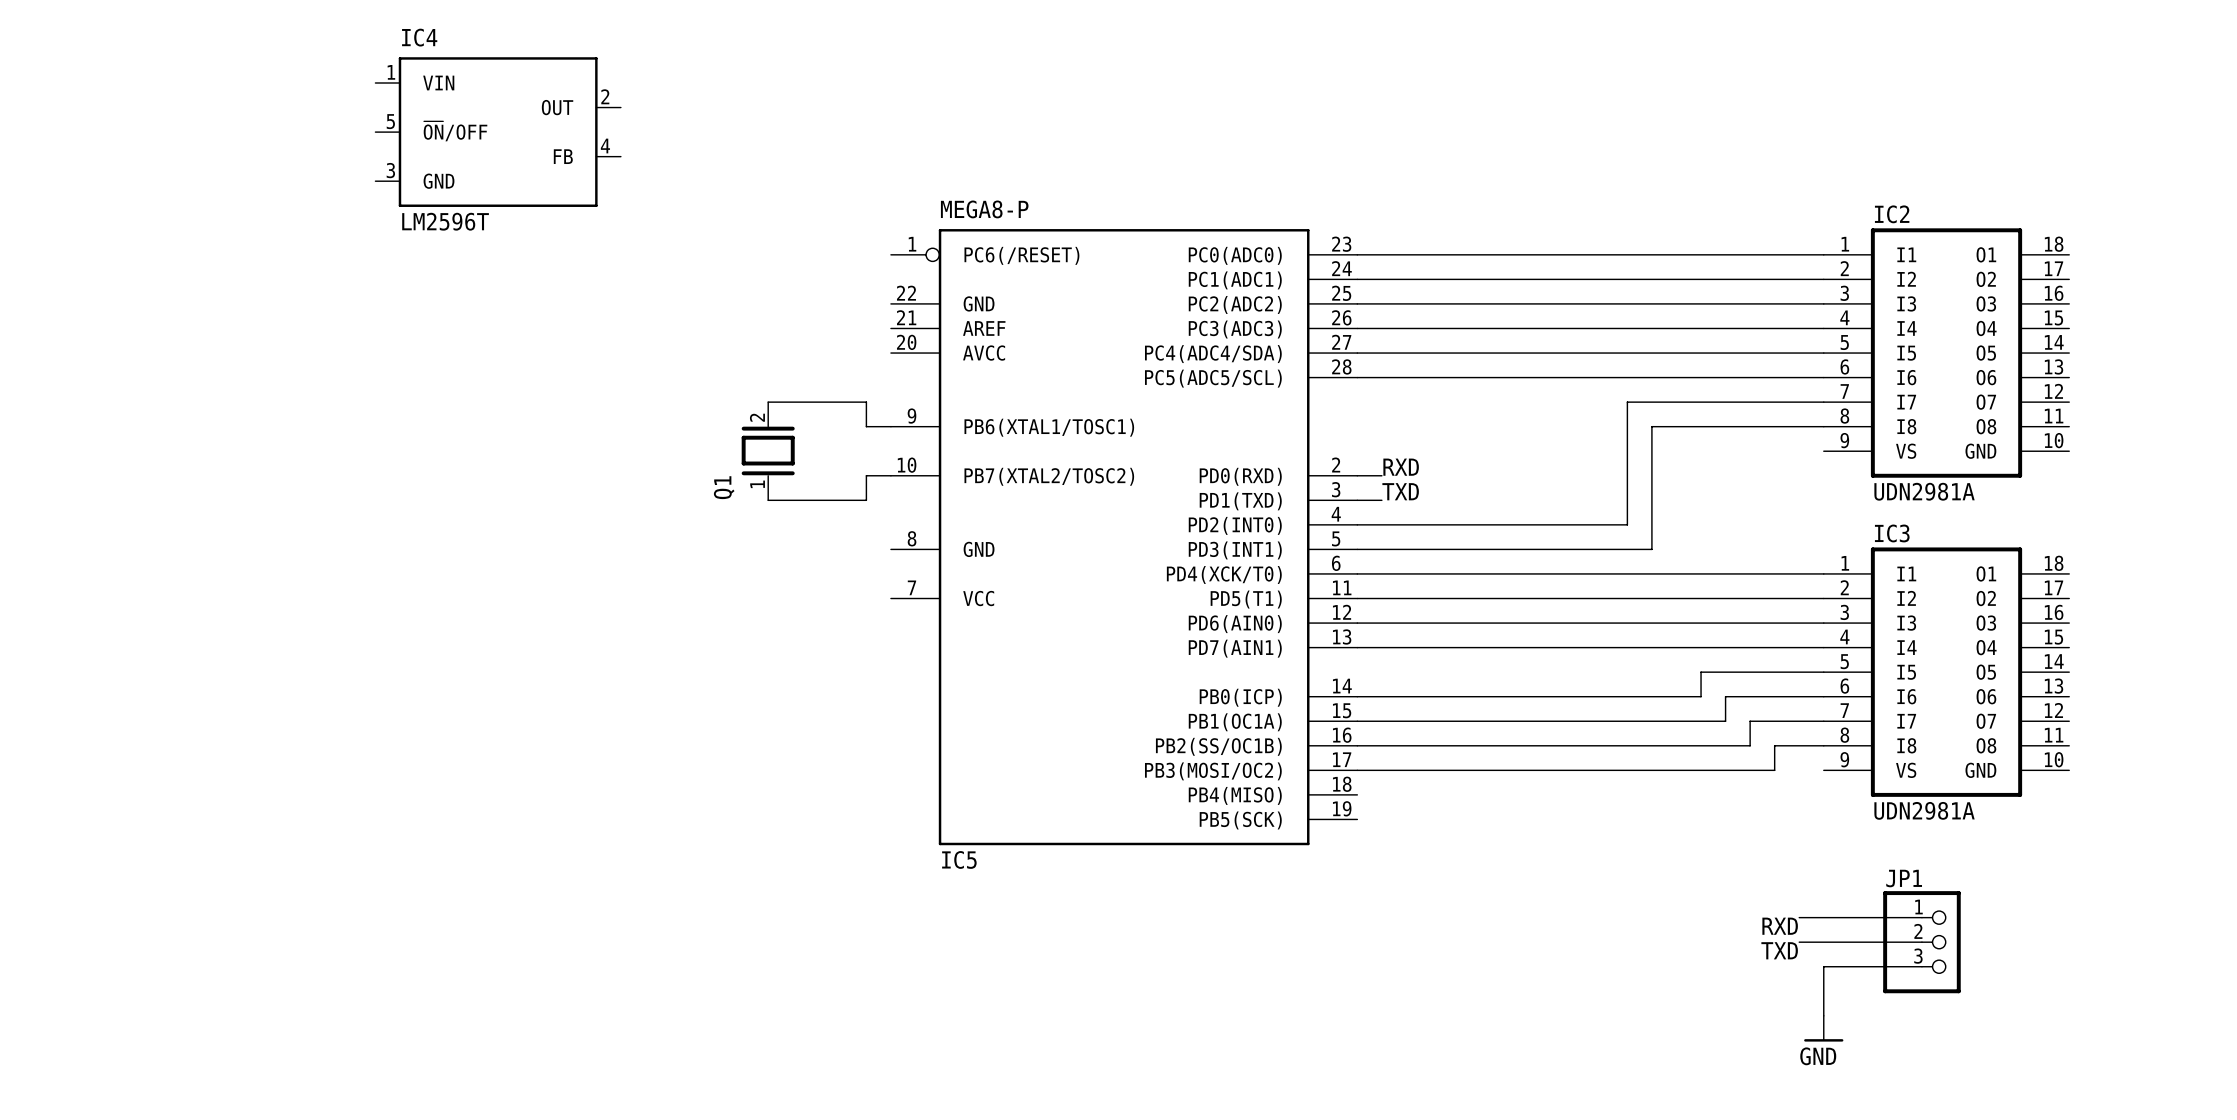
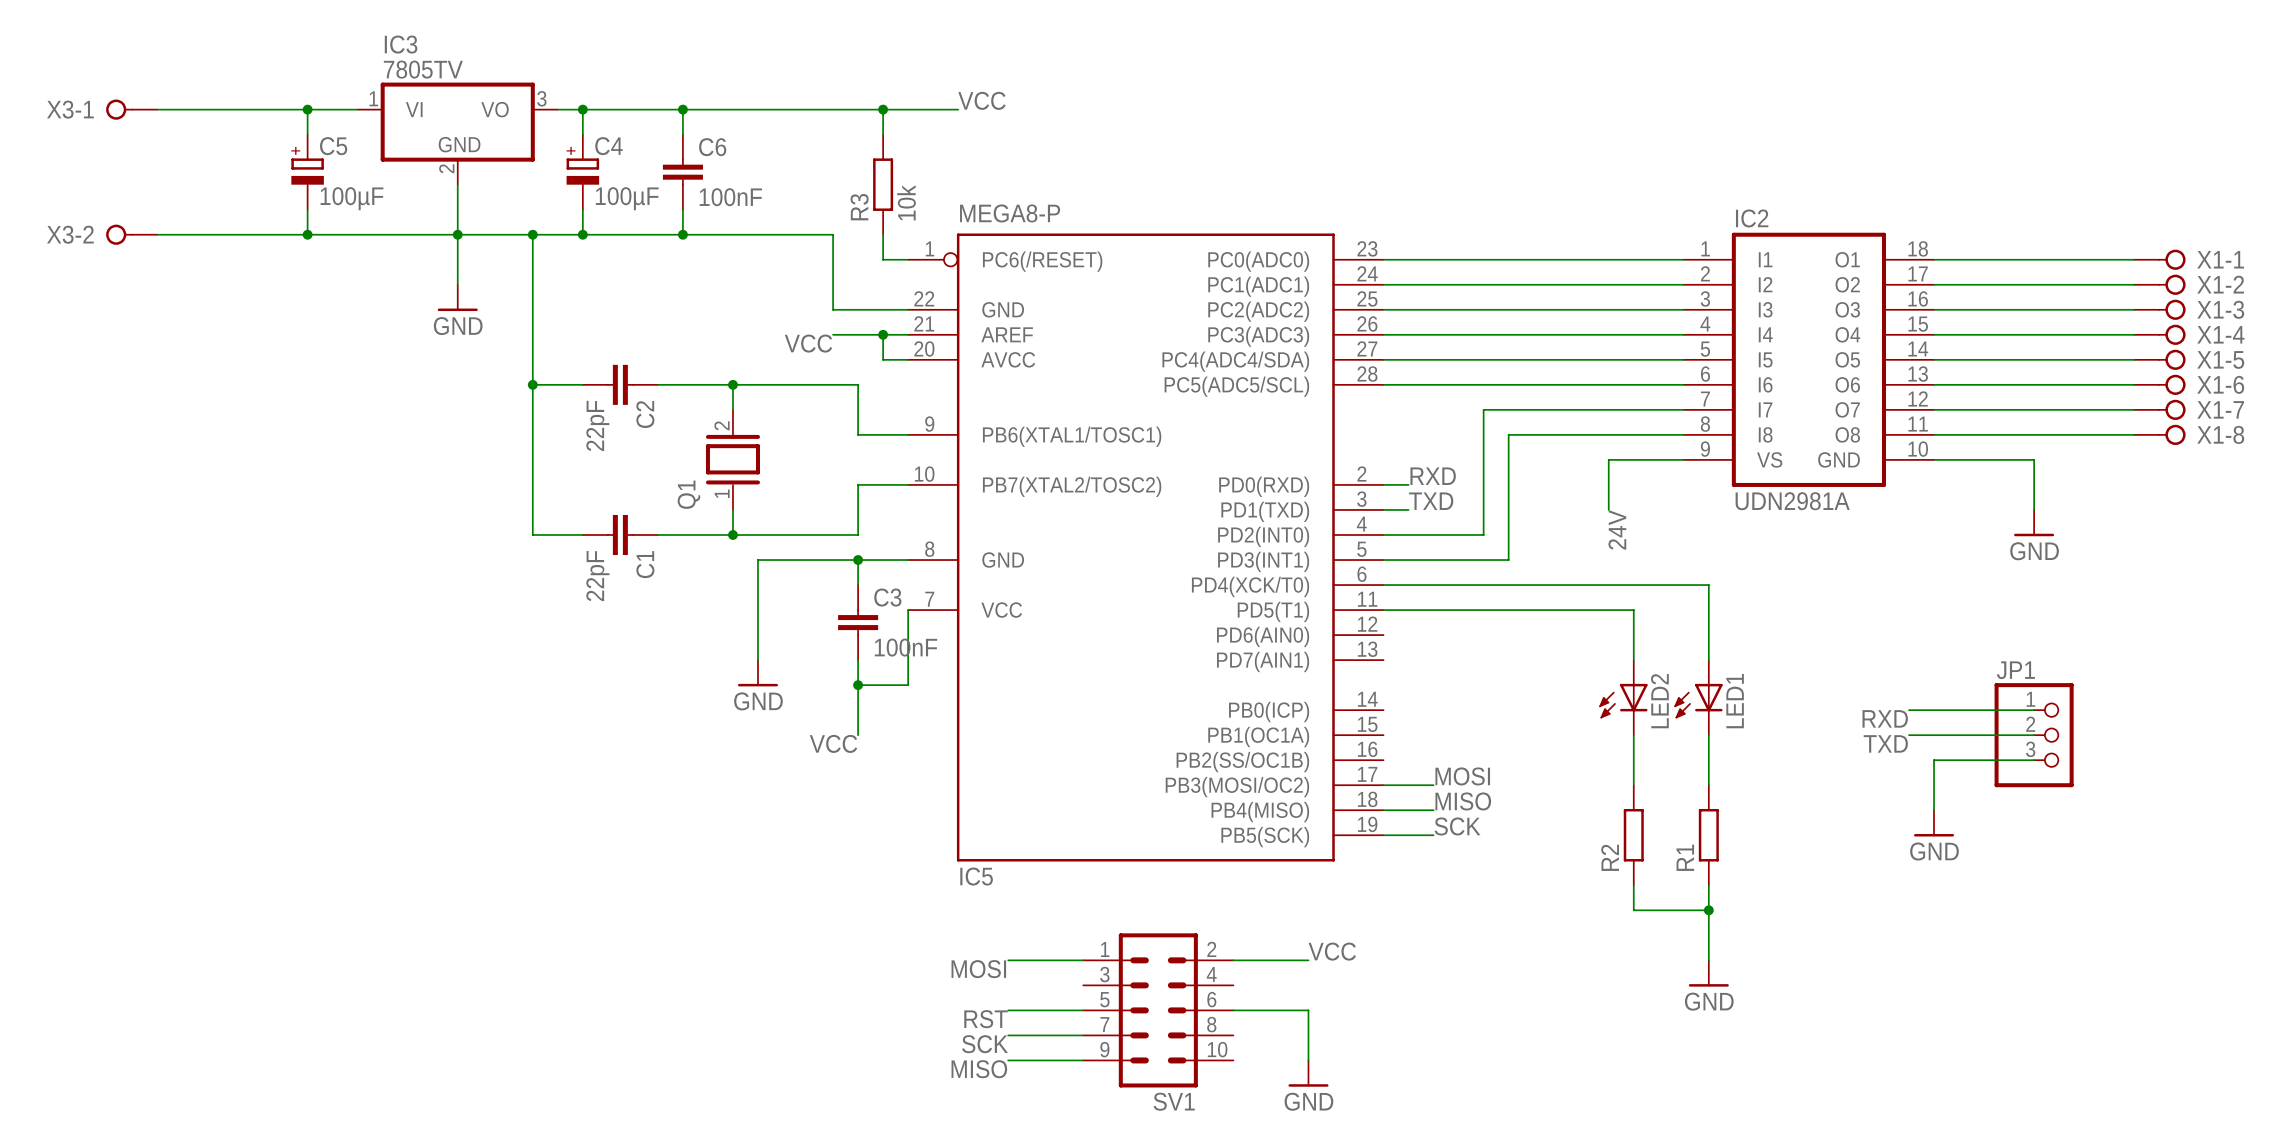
label: none -> VCC (981, 100)
X3-1: none -> (131, 109)
wire: none -> (157, 109) (357, 109)
wire: none -> (307, 109) (307, 134)
junction: none -> (307, 109)
wire: none -> (557, 109) (958, 109)
wire: none -> (582, 109) (582, 134)
junction: none -> (582, 109)
wire: none -> (682, 109) (682, 134)
junction: none -> (682, 109)
wire: none -> (883, 109) (883, 134)
junction: none -> (883, 109)
IC4: LM2596T (498, 132) -> none
C5: none -> 100µF (307, 172)
C4: none -> 100µF (582, 172)
C6: none -> 100nF (682, 172)
wire: none -> (457, 184) (457, 284)
R3: none -> 10k (883, 184)
wire: none -> (307, 209) (307, 234)
wire: none -> (582, 209) (582, 234)
wire: none -> (682, 209) (682, 234)
X3-2: none -> (131, 234)
wire: none -> (157, 234) (833, 234) (833, 309) (908, 309)
junction: none -> (307, 234)
junction: none -> (457, 234)
wire: none -> (532, 234) (532, 534) (582, 534)
junction: none -> (532, 234)
junction: none -> (582, 234)
junction: none -> (682, 234)
wire: none -> (883, 234) (883, 259) (908, 259)
wire: (1651, 254) (1823, 254) -> none
wire: none -> (1934, 259) (2134, 259)
X1-1: none -> (2159, 259)
wire: (1651, 279) (1823, 279) -> none
wire: none -> (1934, 284) (2134, 284)
X1-2: none -> (2159, 284)
power symbol: none -> GND (457, 297)
wire: (1651, 303) (1823, 303) -> none
wire: none -> (1934, 309) (2134, 309)
X1-3: none -> (2159, 309)
wire: none -> (833, 334) (908, 334)
wire: none -> (883, 334) (883, 359) (908, 359)
junction: none -> (883, 334)
wire: (1651, 328) (1823, 328) -> none
wire: none -> (1934, 334) (2134, 334)
X1-4: none -> (2159, 334)
label: none -> VCC (808, 343)
wire: (1651, 353) (1823, 353) -> none
wire: none -> (1934, 359) (2134, 359)
IC2 position: (1946, 353) -> (1808, 359)
X1-5: none -> (2159, 359)
wire: none -> (532, 384) (582, 384)
junction: none -> (532, 384)
C2: none -> 22pF (620, 384)
wire: none -> (732, 384) (732, 409)
junction: none -> (732, 384)
wire: (1651, 377) (1823, 377) -> none
wire: none -> (1934, 384) (2134, 384)
X1-6: none -> (2159, 384)
wire: (768, 402) (866, 402) (866, 426) -> (657, 384) (858, 384) (858, 434) (883, 434)
wire: (1627, 402) (1627, 524) (1455, 524) -> (1658, 409) (1483, 409) (1483, 534)
wire: (1651, 402) (1823, 402) -> none
wire: none -> (1934, 409) (2134, 409)
X1-7: none -> (2159, 409)
wire: (1823, 426) (1651, 426) (1651, 549) (1480, 549) -> (1683, 434) (1508, 434) (1508, 560)
wire: none -> (1934, 434) (2134, 434)
X1-8: none -> (2159, 434)
Q1 position: (768, 451) -> (732, 459)
wire: none -> (1683, 459) (1608, 459) (1608, 509)
wire: none -> (1934, 459) (2034, 459) (2034, 509)
wire: (866, 475) (866, 500) (768, 500) -> (883, 484) (858, 484) (858, 534) (657, 534)
wire: none -> (732, 509) (732, 534)
power symbol: none -> GND (2034, 523)
label: none -> 24V (1617, 529)
C1: none -> 22pF (620, 534)
junction: none -> (732, 534)
IC3 name position: IC3 (1892, 533) -> IC3 (401, 44)
IC3 symbol: [1823, 547, 2070, 797] -> [357, 82, 558, 185]
wire: none -> (858, 560) (858, 585)
junction: none -> (858, 560)
wire: none -> (908, 560) (758, 560) (758, 660)
wire: (1676, 573) (1823, 573) -> (1708, 585) (1708, 660)
wire: none -> (908, 610) (908, 685) (858, 685)
wire: (1602, 598) (1823, 598) -> (1633, 610) (1633, 660)
C3: none -> 100nF (858, 622)
wire: (1357, 623) (1823, 623) -> none
wire: none -> (858, 660) (858, 735)
wire: (1357, 647) (1823, 647) -> none
power symbol: none -> GND (758, 673)
junction: none -> (858, 685)
wire: (1823, 672) (1701, 672) (1701, 696) (1357, 696) -> none
LED2: none -> (1623, 697)
LED1: none -> (1698, 697)
wire: (1823, 696) (1725, 696) (1725, 721) (1357, 721) -> none
wire: none -> (1633, 735) (1633, 785)
wire: none -> (1708, 735) (1708, 785)
wire: (1823, 721) (1750, 721) (1750, 745) (1357, 745) -> none
label: none -> VCC (833, 743)
wire: (1823, 745) (1774, 745) (1774, 770) (1406, 770) -> none
label: none -> MOSI (1462, 776)
label: none -> MISO (1463, 801)
wire: none -> (1383, 810) (1433, 810)
power symbol: none -> GND (1934, 823)
label: none -> SCK (1457, 826)
IC3 value: UDN2981A (1924, 810) -> 7805TV (423, 69)
wire: none -> (1383, 835) (1433, 835)
R2: none -> (1633, 835)
R1: none -> (1708, 835)
wire: none -> (1633, 885) (1633, 910) (1708, 910)
wire: none -> (1708, 885) (1708, 960)
junction: none -> (1708, 910)
wire: (1799, 917) (1921, 917) -> (1909, 710) (2034, 710)
label position: RXD (1780, 926) -> RXD (1885, 718)
label: none -> VCC (1332, 951)
wire: none -> (1008, 960) (1083, 960)
wire: none -> (1233, 960) (1308, 960)
wire: (1799, 942) (1921, 942) -> (1909, 735) (2034, 735)
JP1 position: (1921, 942) -> (2034, 735)
label: none -> MOSI (978, 969)
label position: TXD (1779, 950) -> TXD (1885, 743)
power symbol: none -> GND (1708, 973)
wire: (1921, 966) (1823, 966) (1823, 1015) -> (2034, 760) (1934, 760) (1934, 810)
wire: none -> (1008, 1010) (1083, 1010)
SV1: none -> (1158, 1010)
wire: none -> (1233, 1010) (1308, 1010) (1308, 1060)
label: none -> RST (985, 1019)
wire: none -> (1008, 1035) (1083, 1035)
label: none -> SCK (985, 1044)
power symbol: GND (1823, 1028) -> none
wire: none -> (1008, 1060) (1083, 1060)
label: none -> MISO (979, 1069)
power symbol: none -> GND (1308, 1073)

